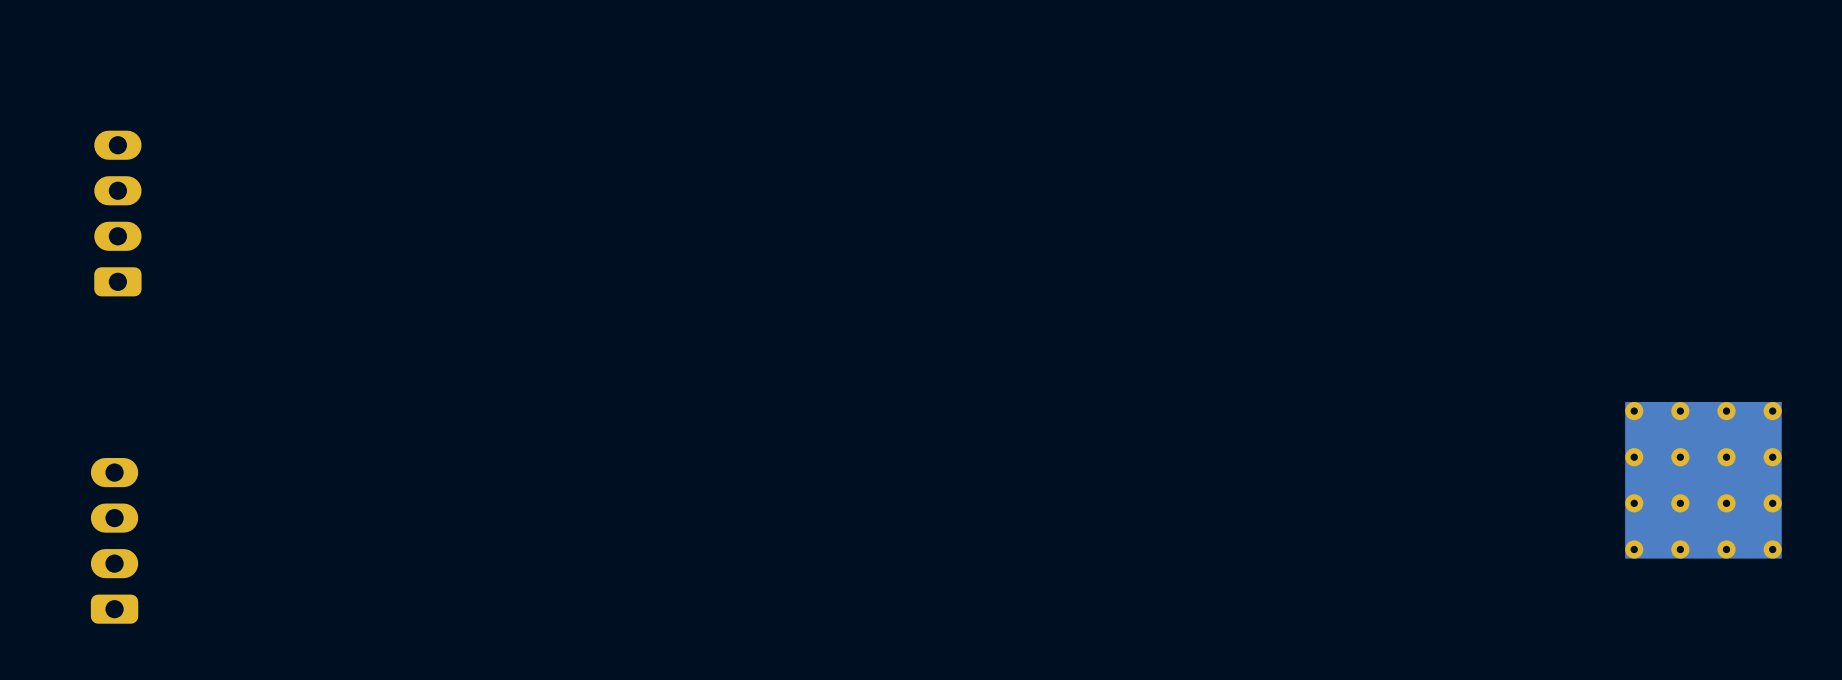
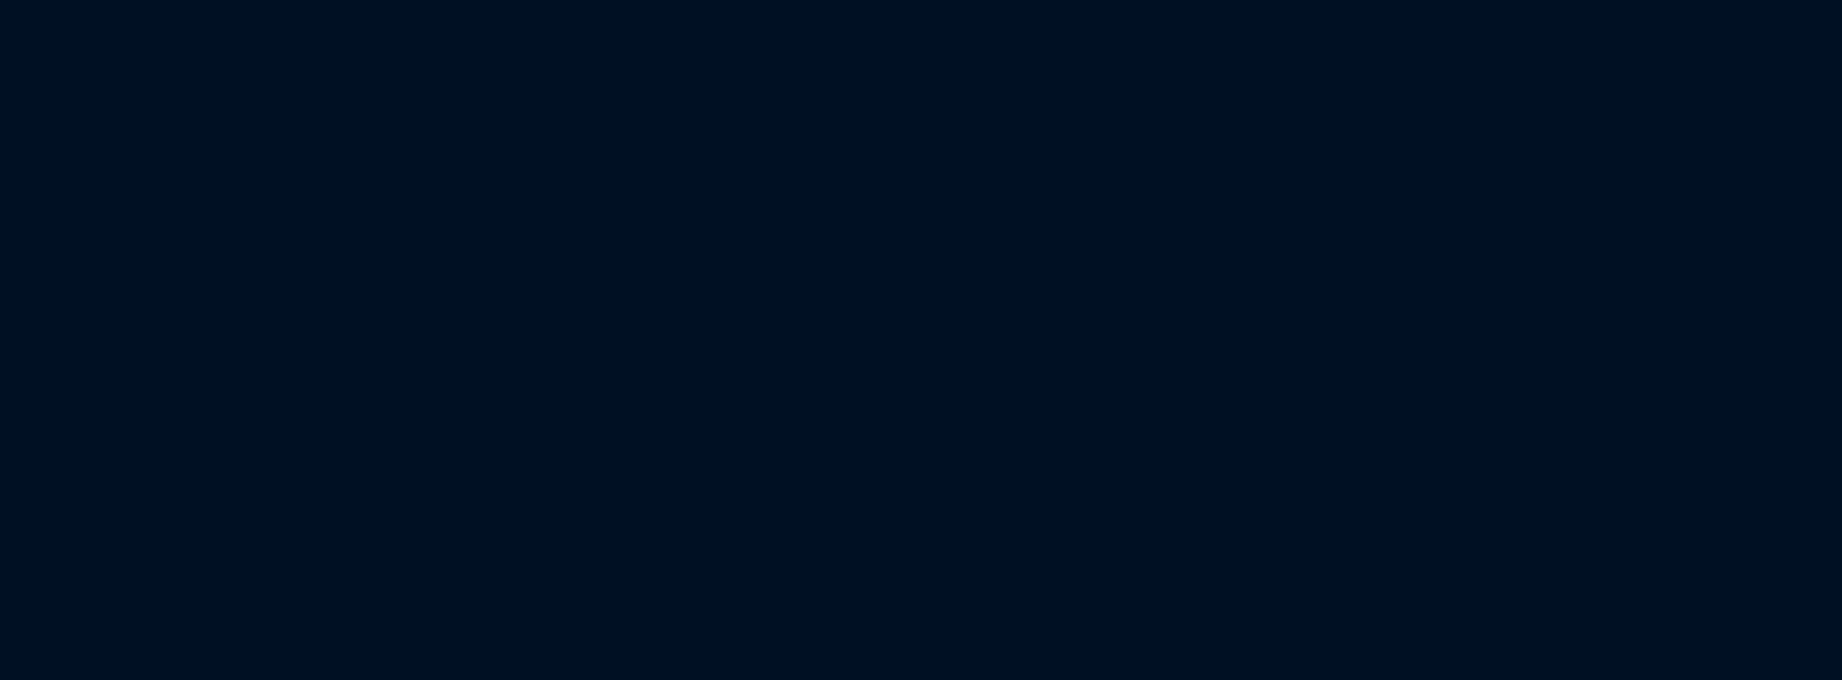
part: (117, 213) -> none
part: (1703, 480) -> none
part: (114, 540) -> none

